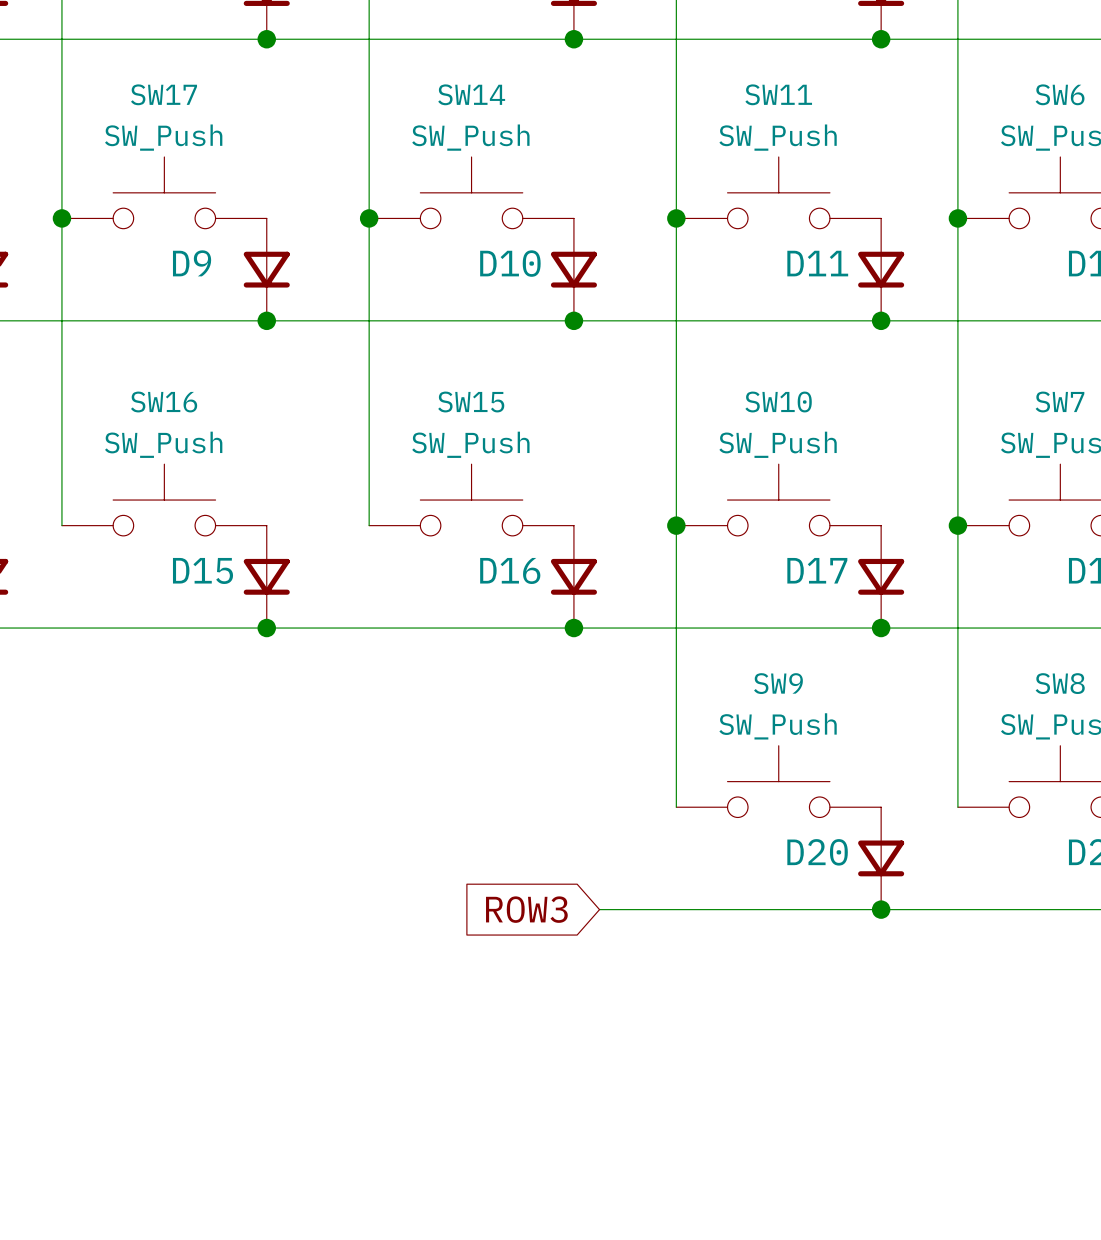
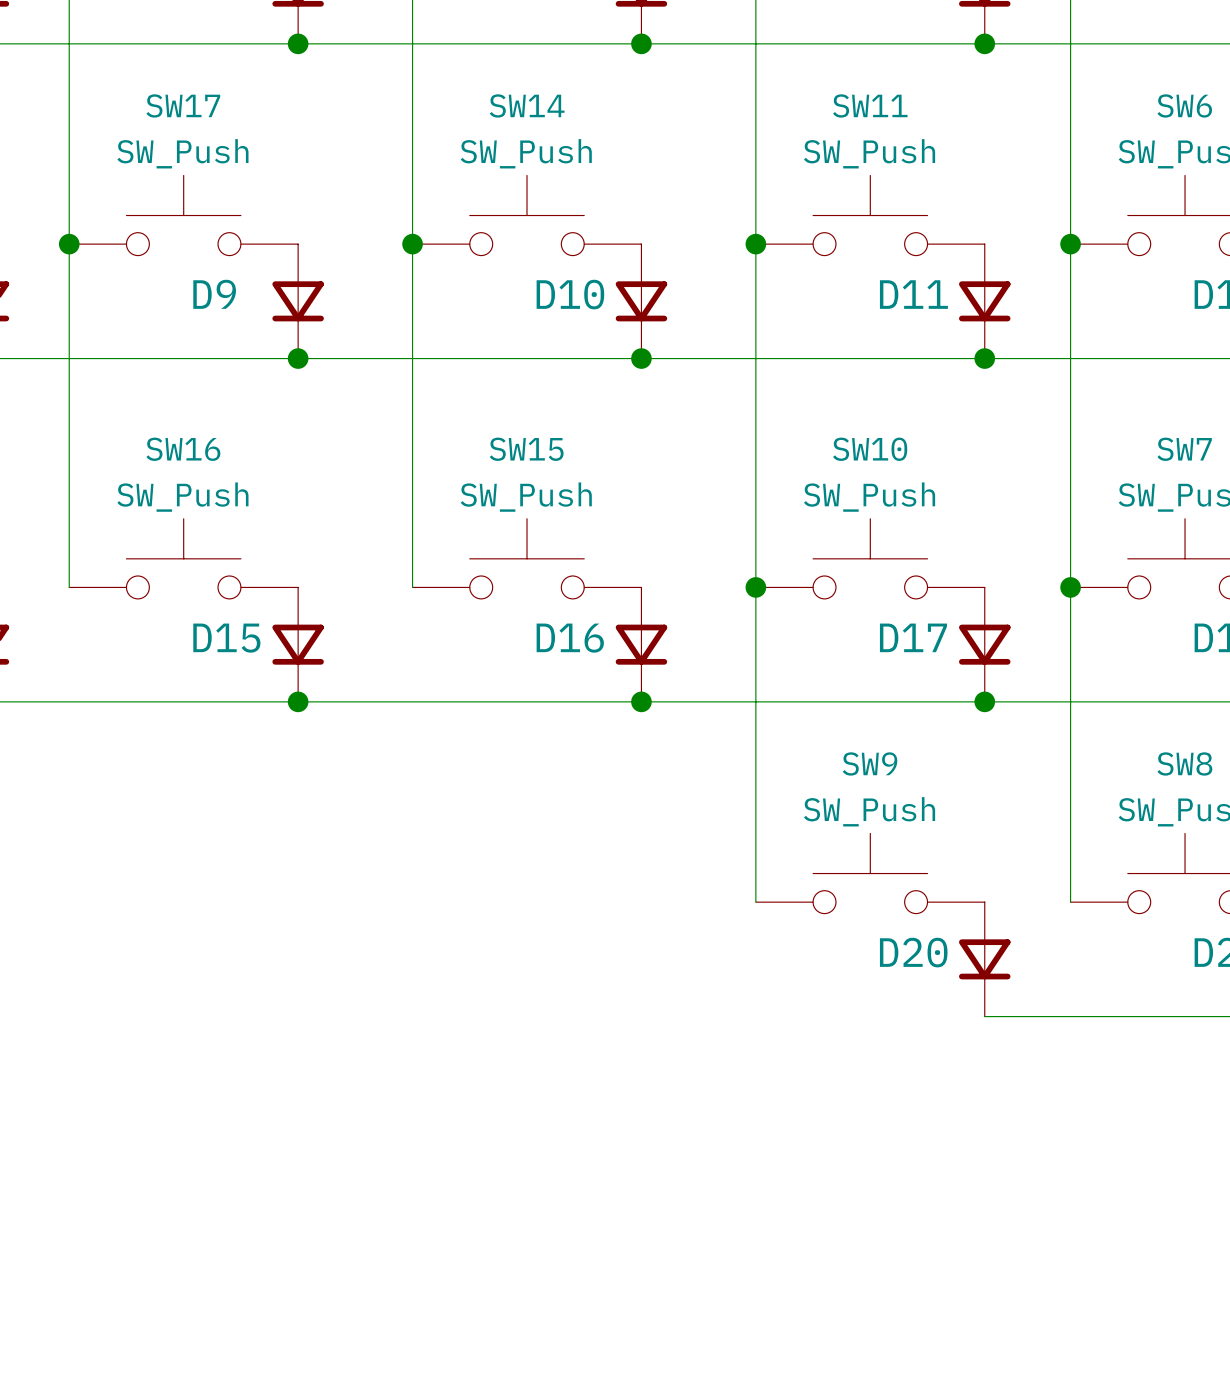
global label: ROW3 (526, 909) -> none
wire: (599, 909) (881, 909) -> none
junction: (881, 909) -> none

